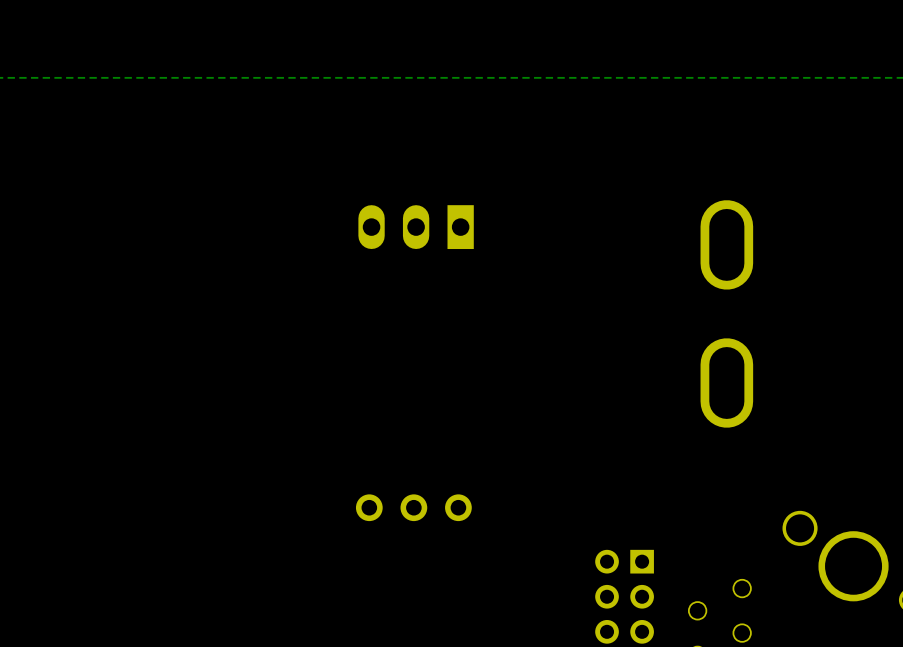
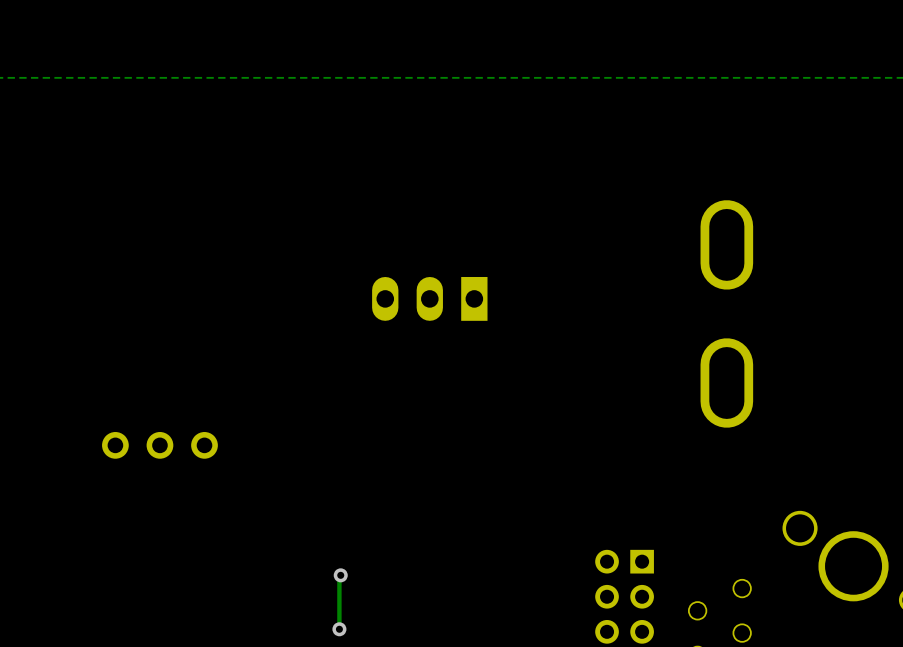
part position: (416, 227) -> (429, 298)
part position: (413, 507) -> (159, 445)
track: none -> (340, 575) (339, 629)
via: none -> (340, 575)
via: none -> (339, 629)

